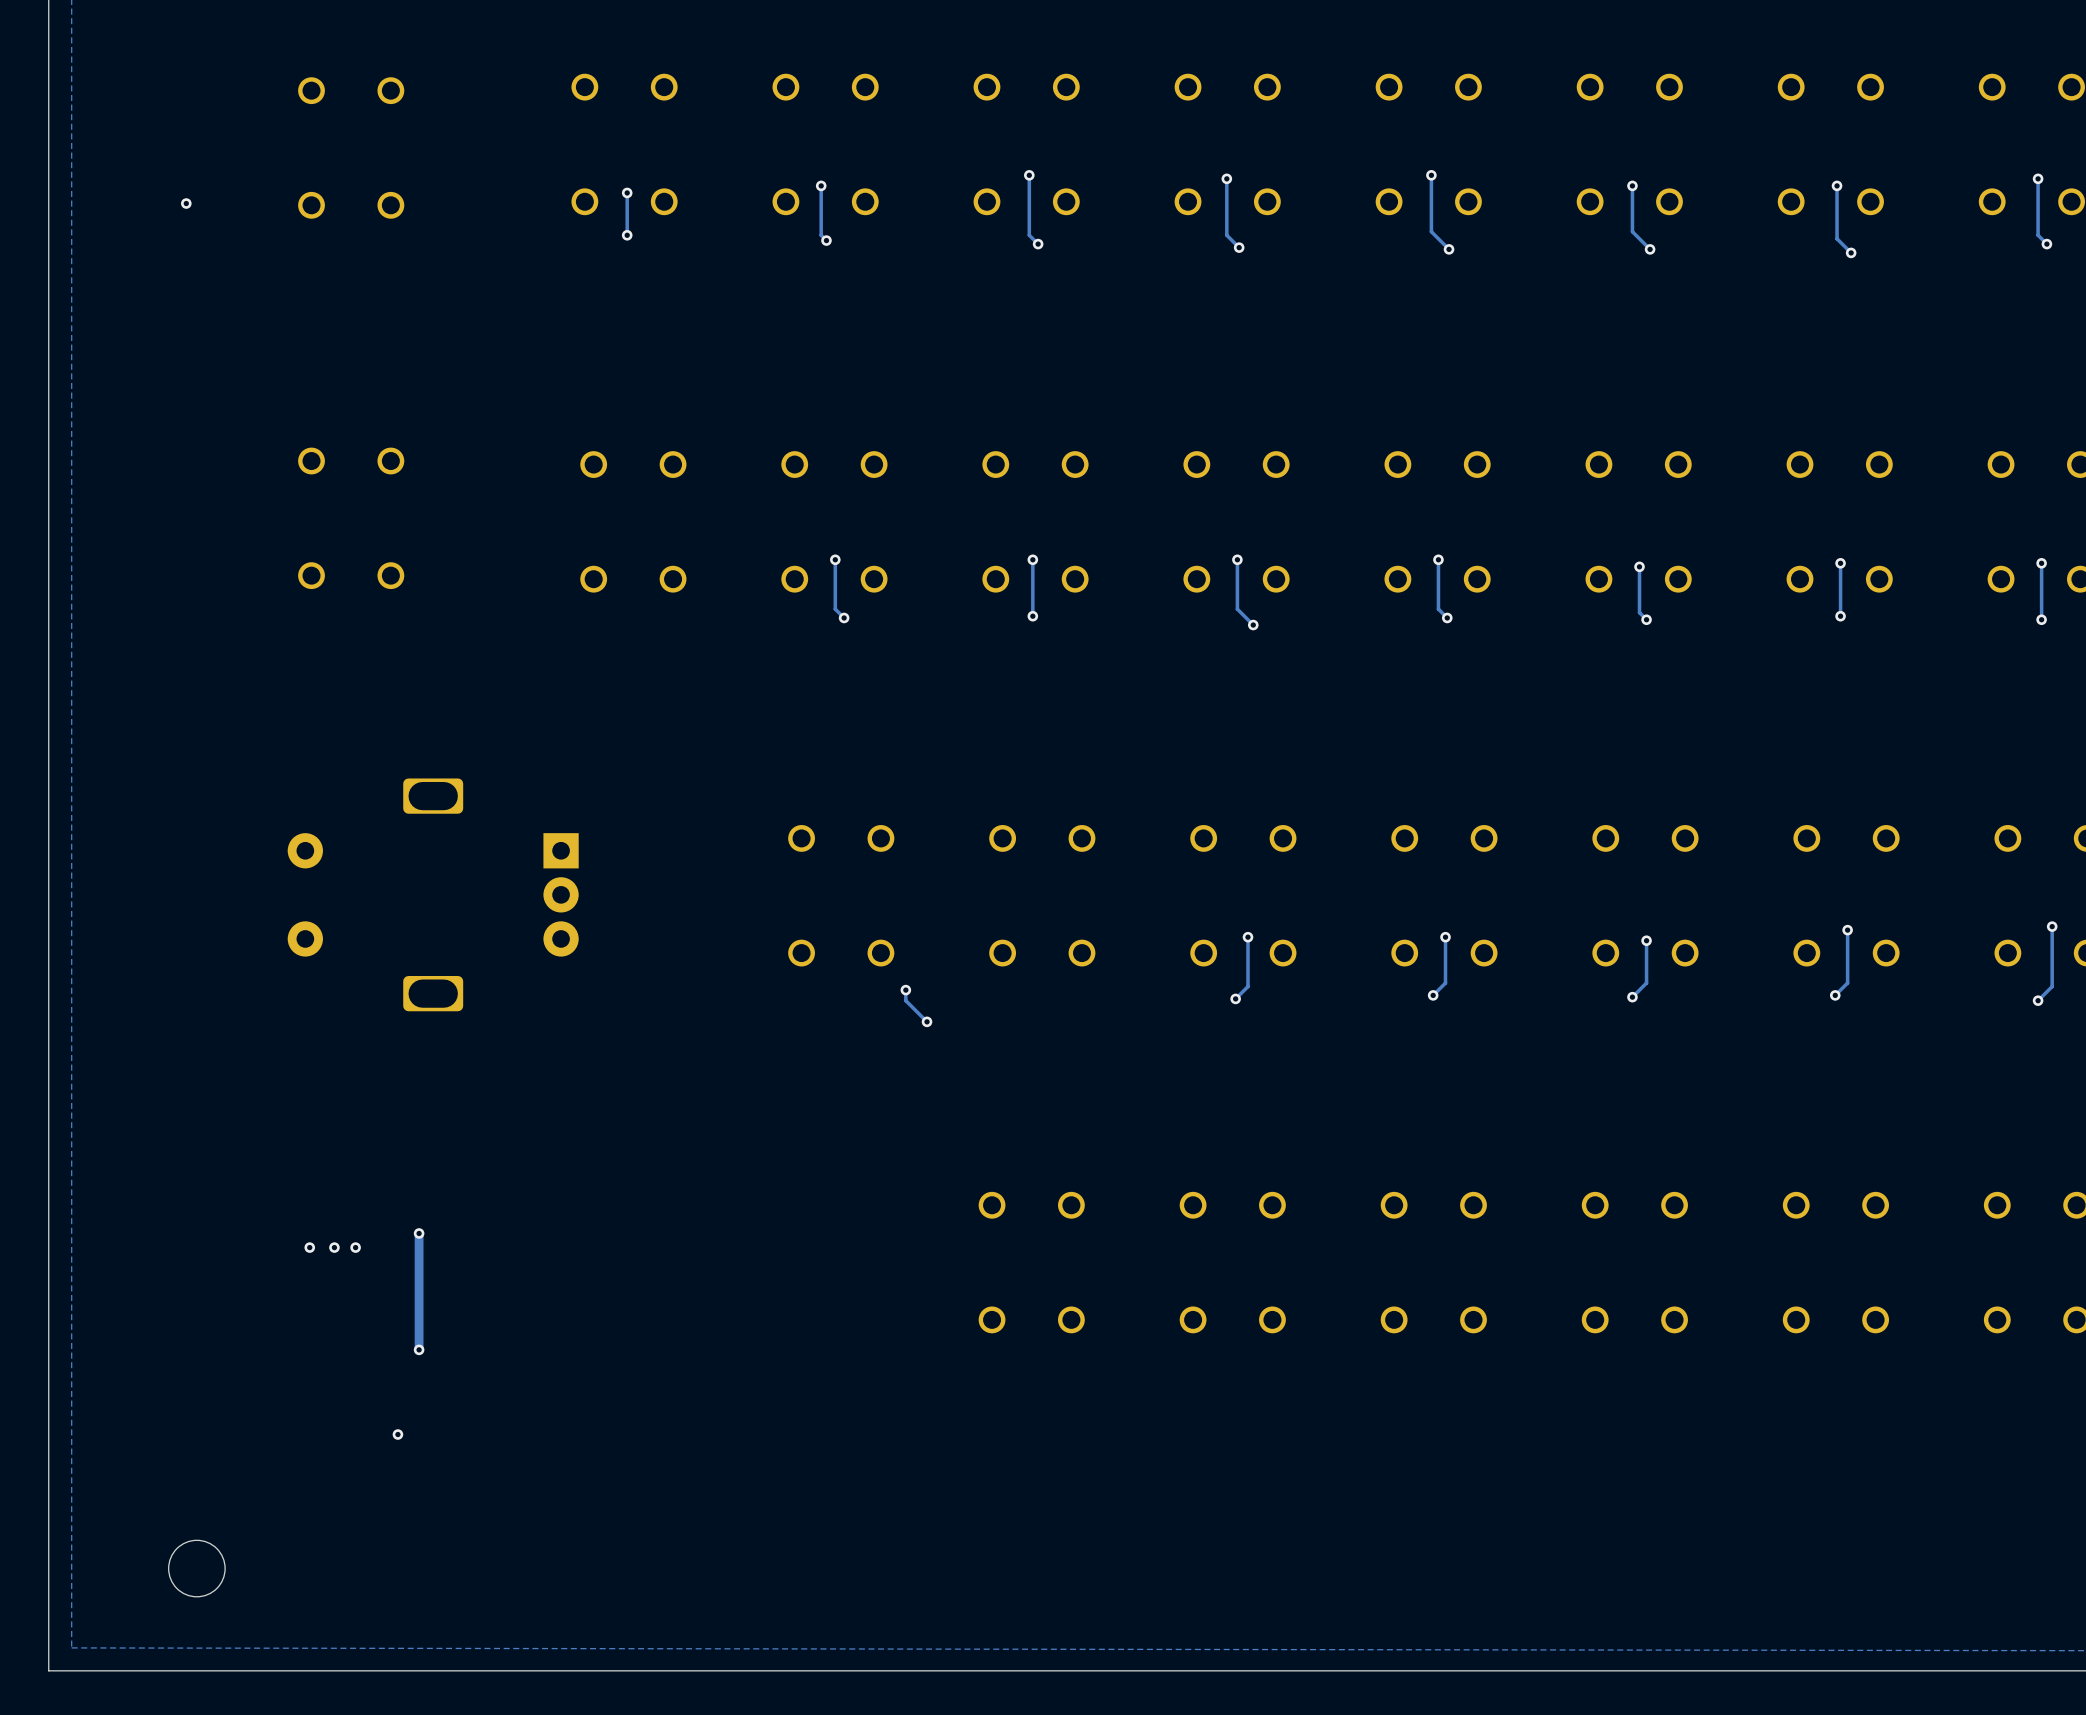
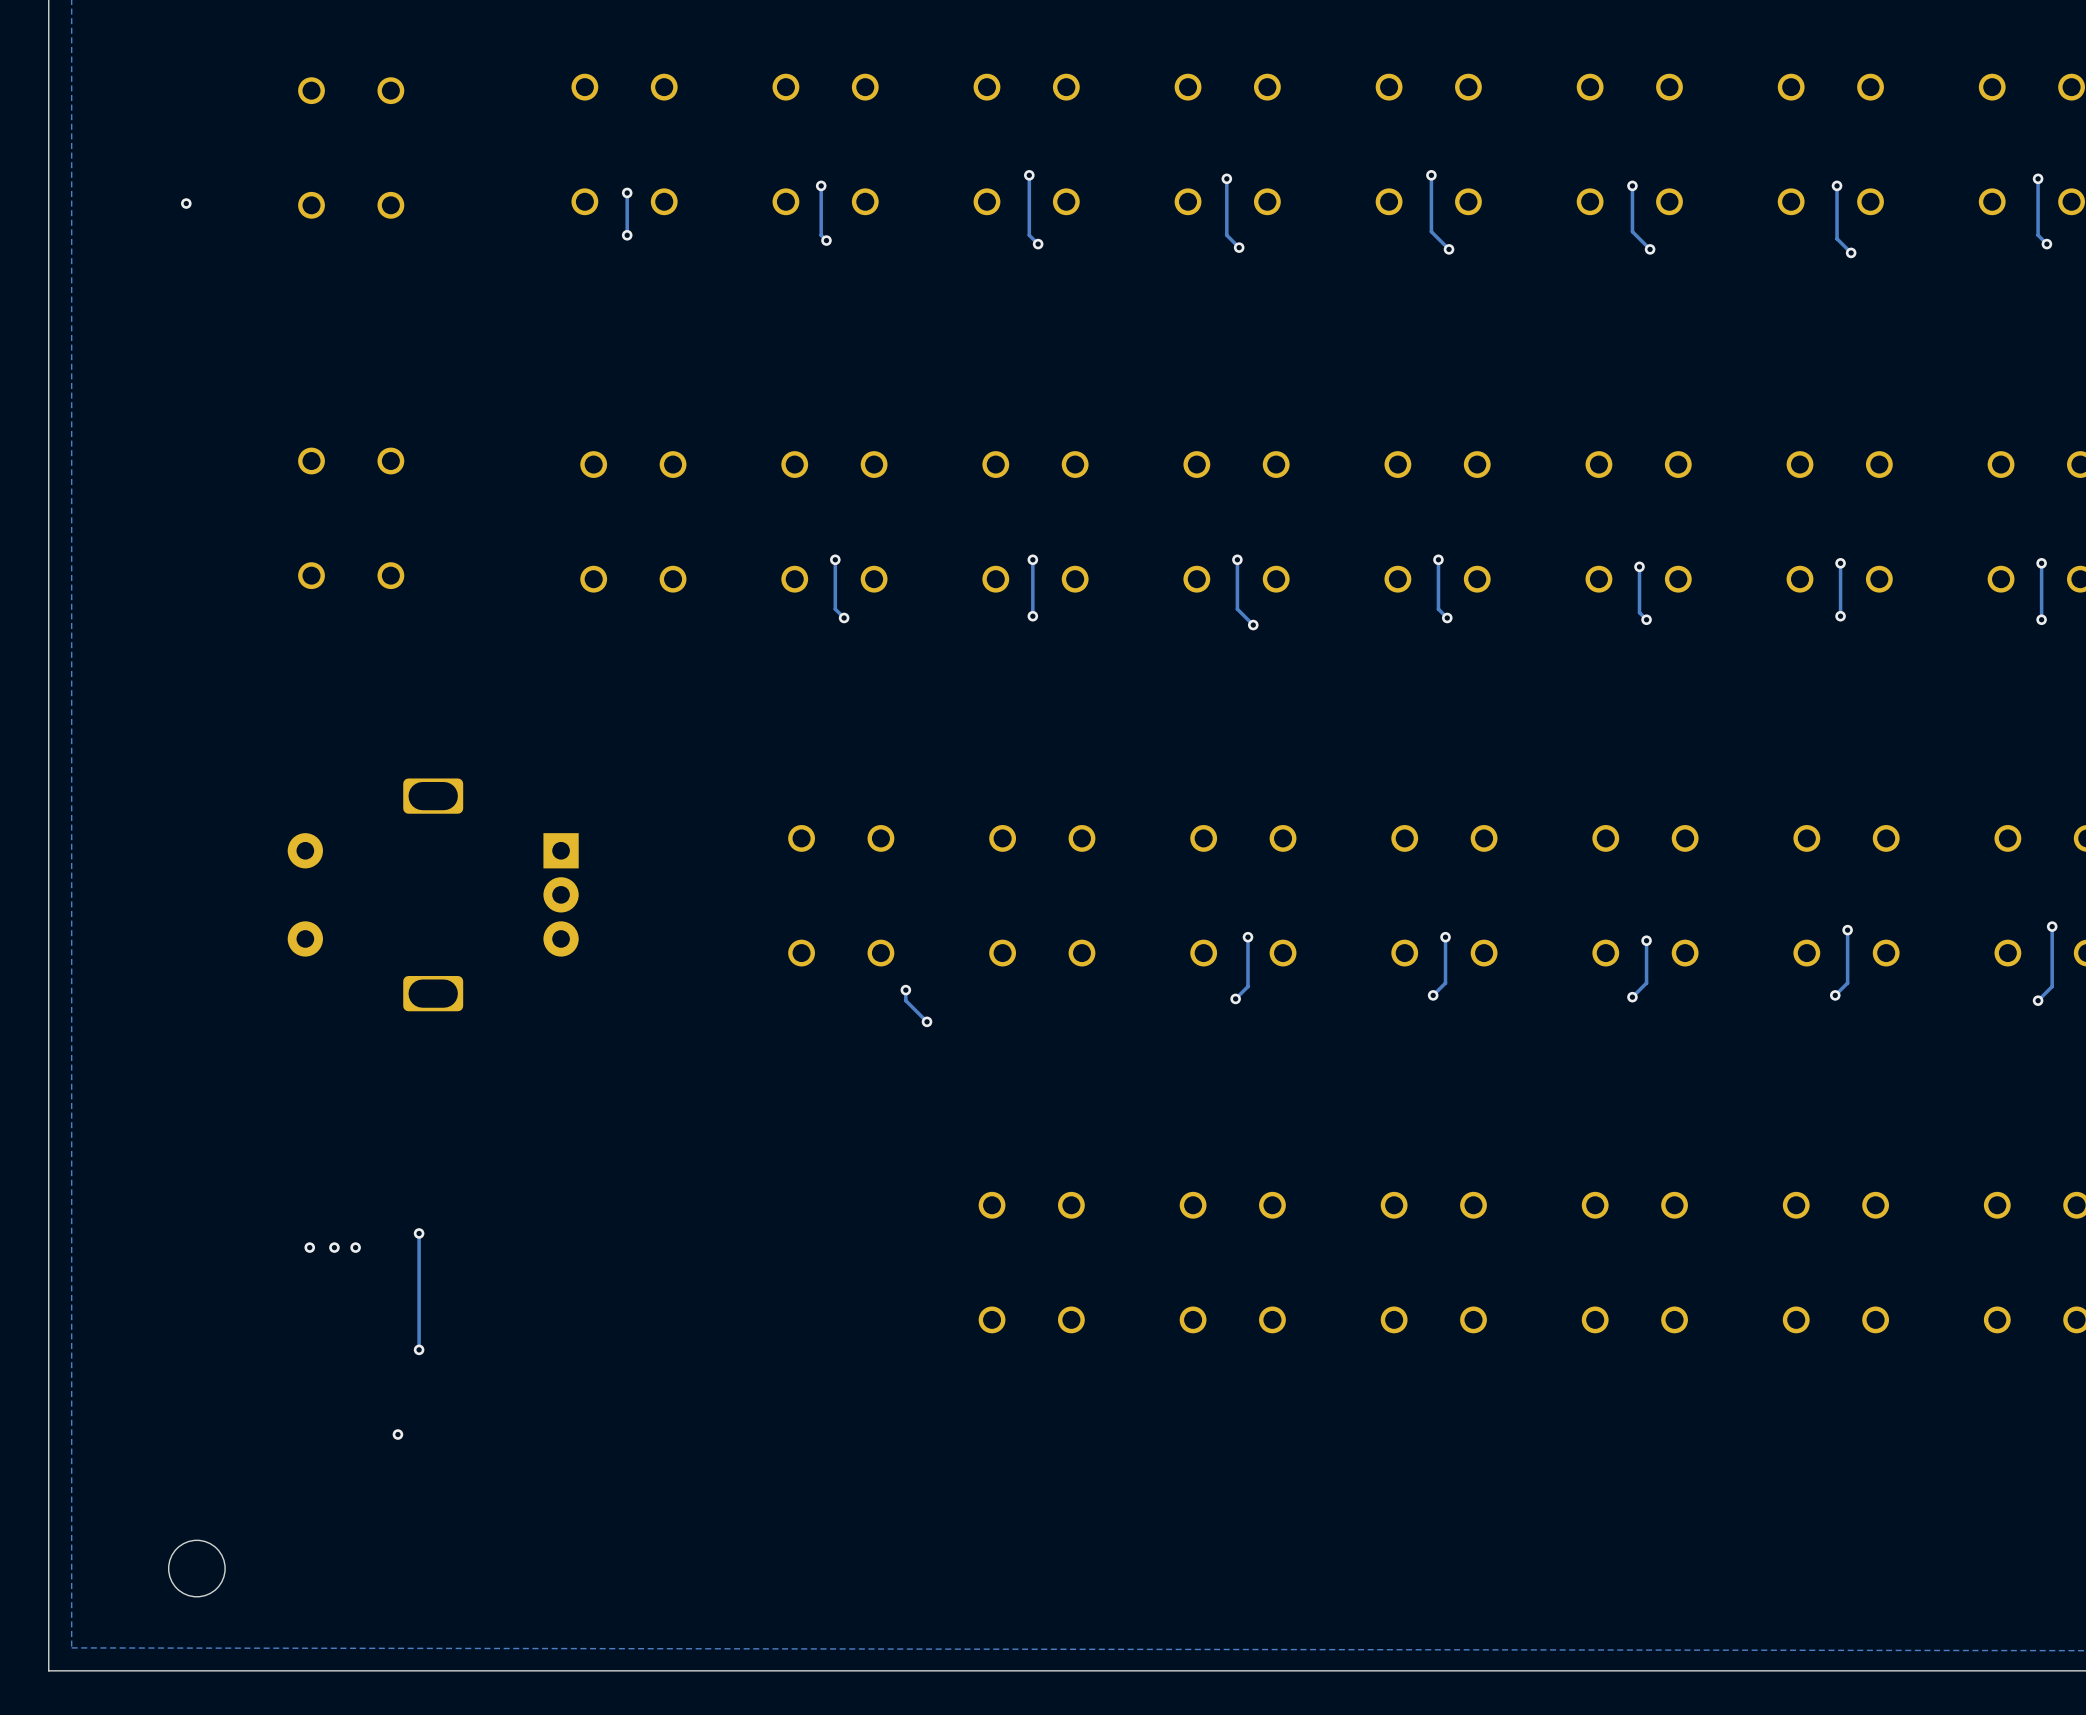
track width: thick (419, 1233) (419, 1349) -> thin (419, 1233) (419, 1349)

